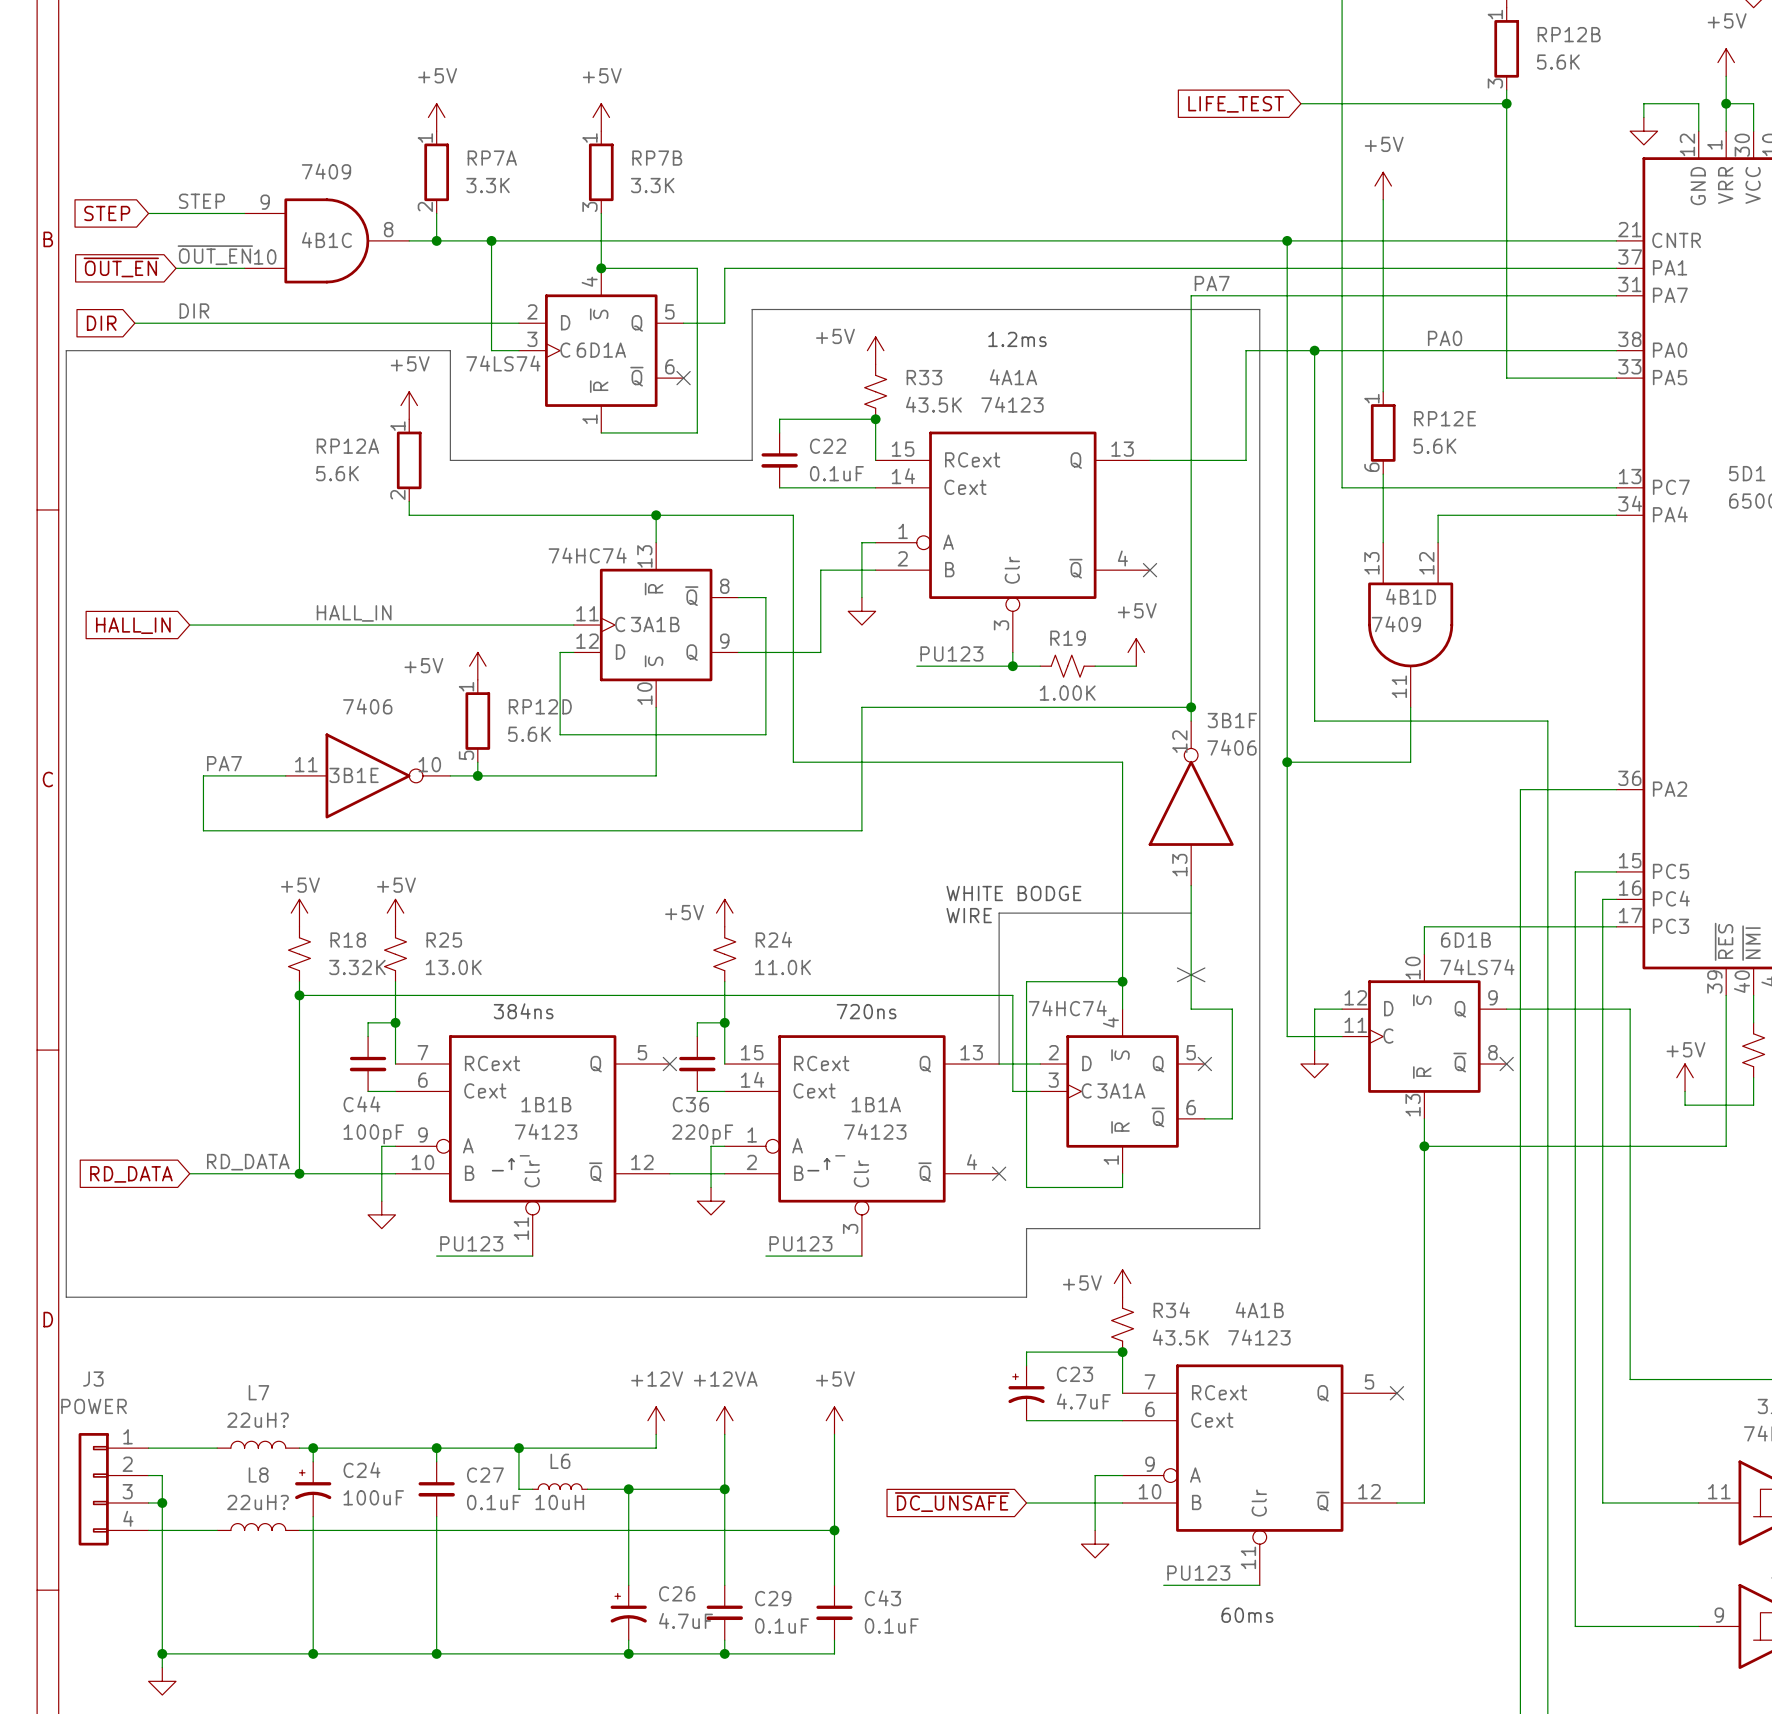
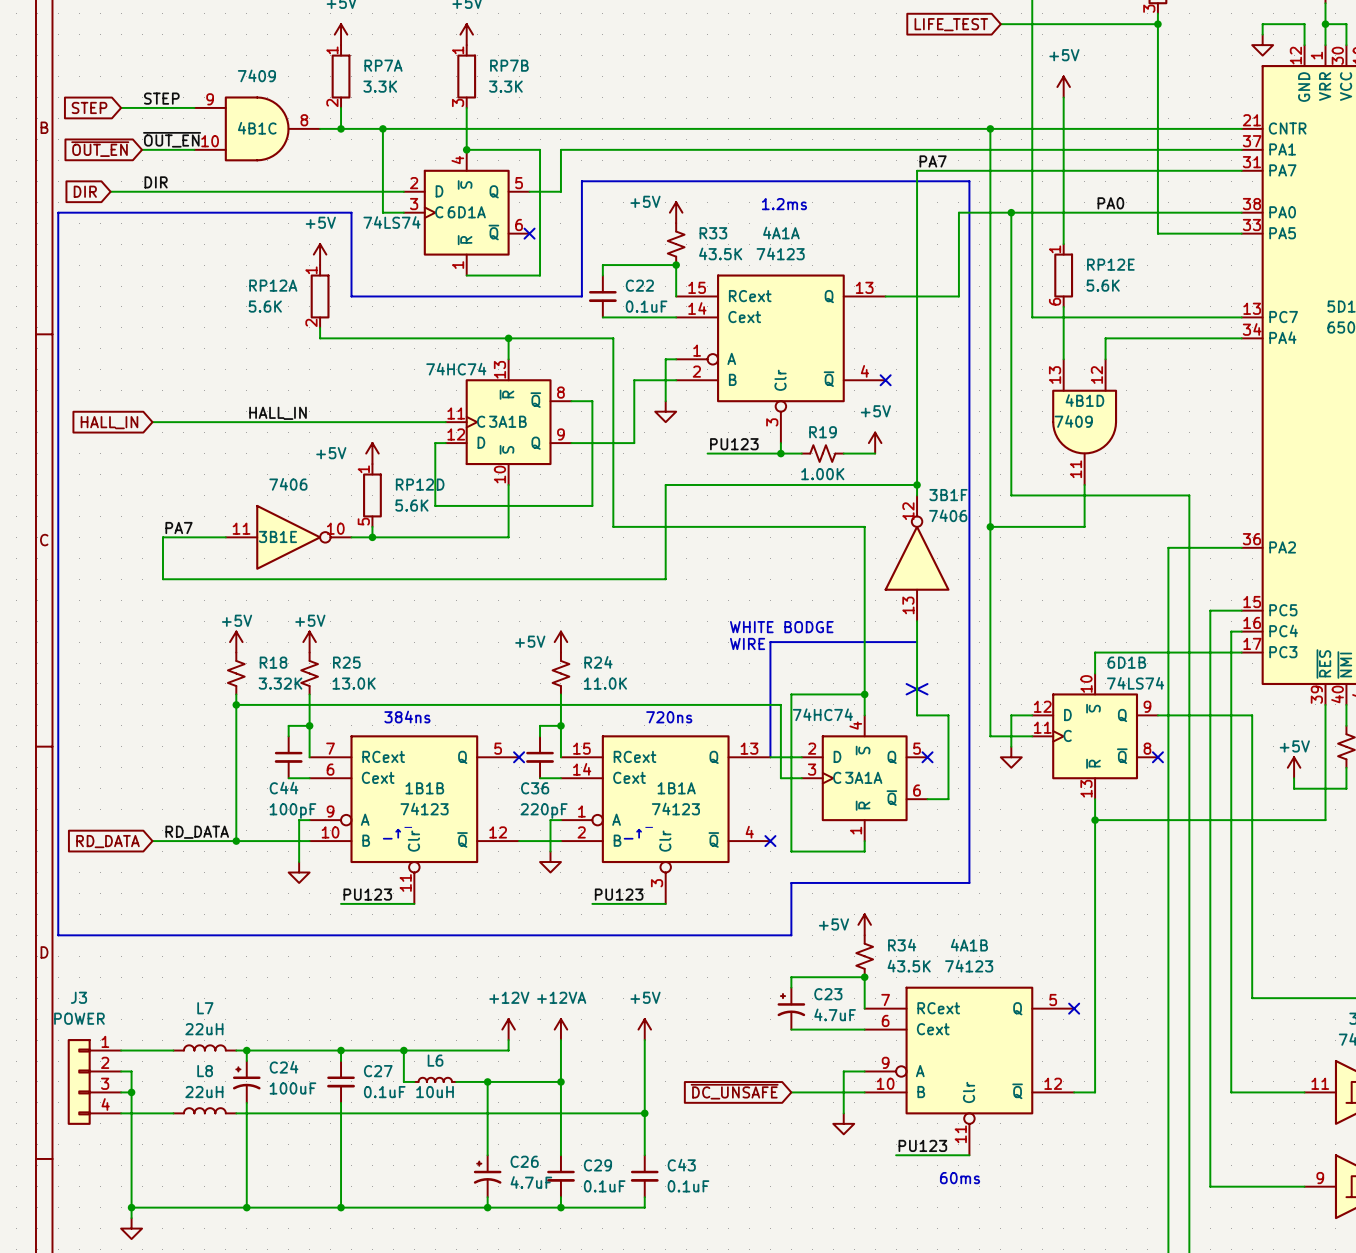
L7 value: 22uH? (258, 1420) -> 22uH (204, 1029)
L8 value: 22uH? (258, 1502) -> 22uH (204, 1092)

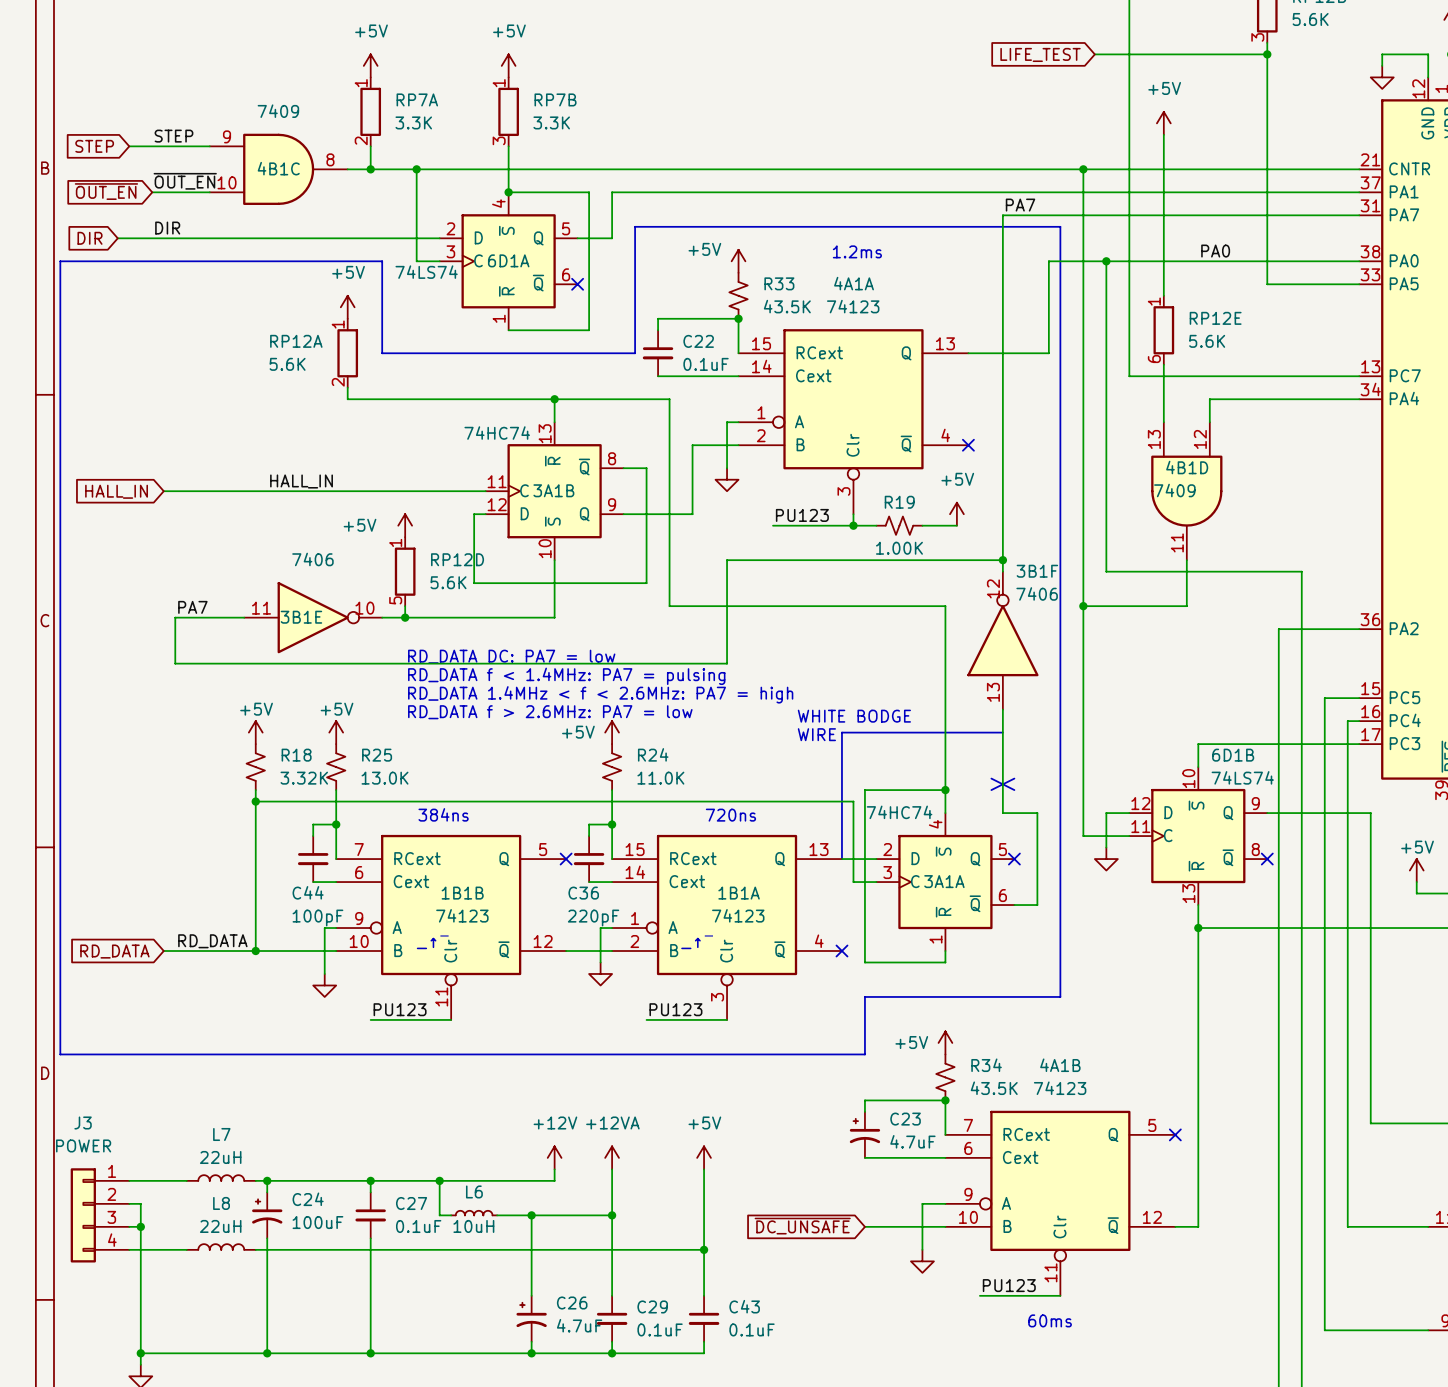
text: none -> RD_DATA DC: PA7 = low (511, 656)
text: none -> RD_DATA f < 1.4MHz: PA7 = pulsing (566, 676)
text: none -> RD_DATA 1.4MHz < f < 2.6MHz: PA7 = high (600, 694)
text: none -> RD_DATA f > 2.6MHz: PA7 = low (550, 712)

